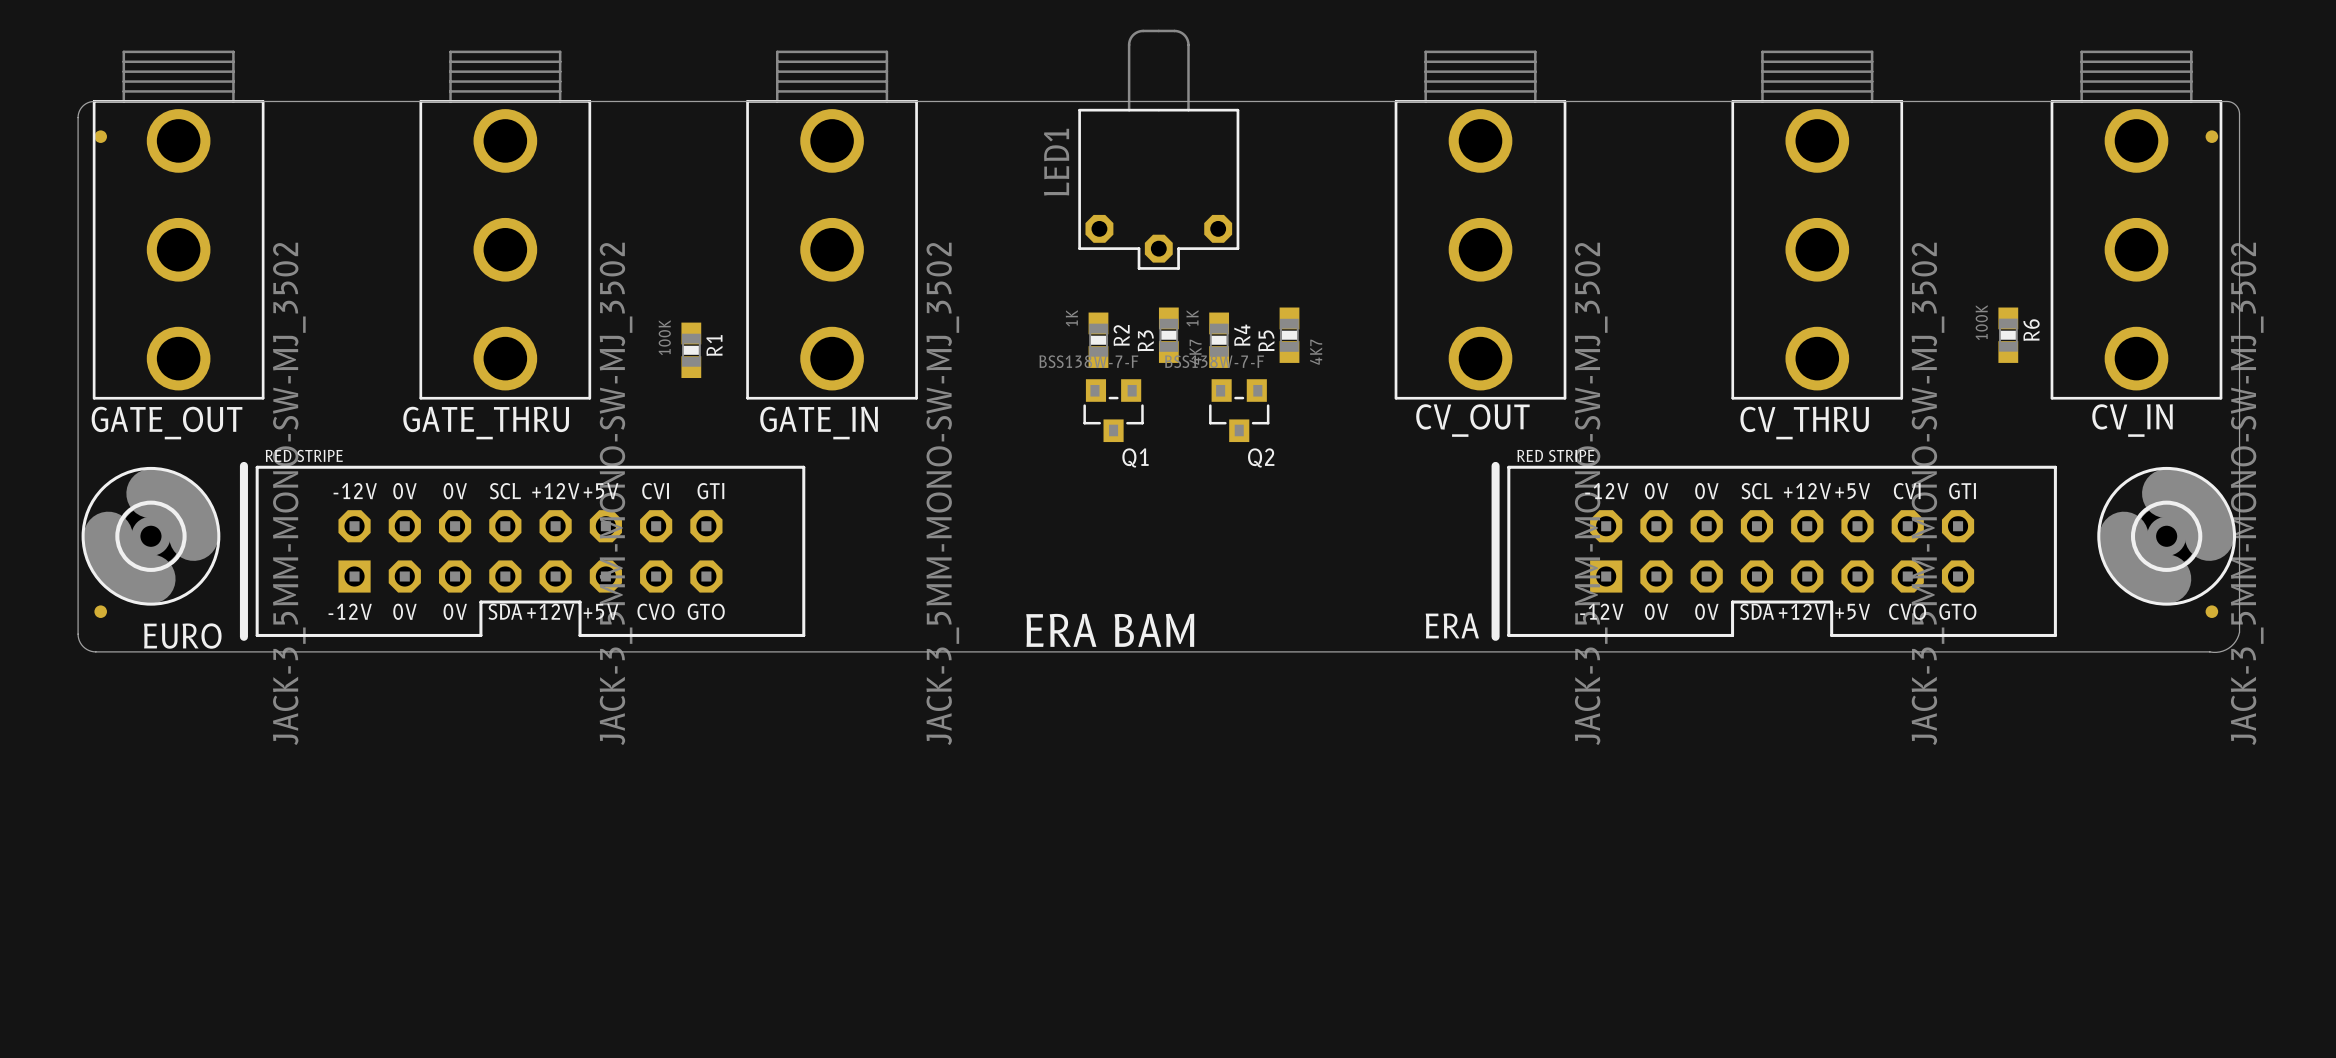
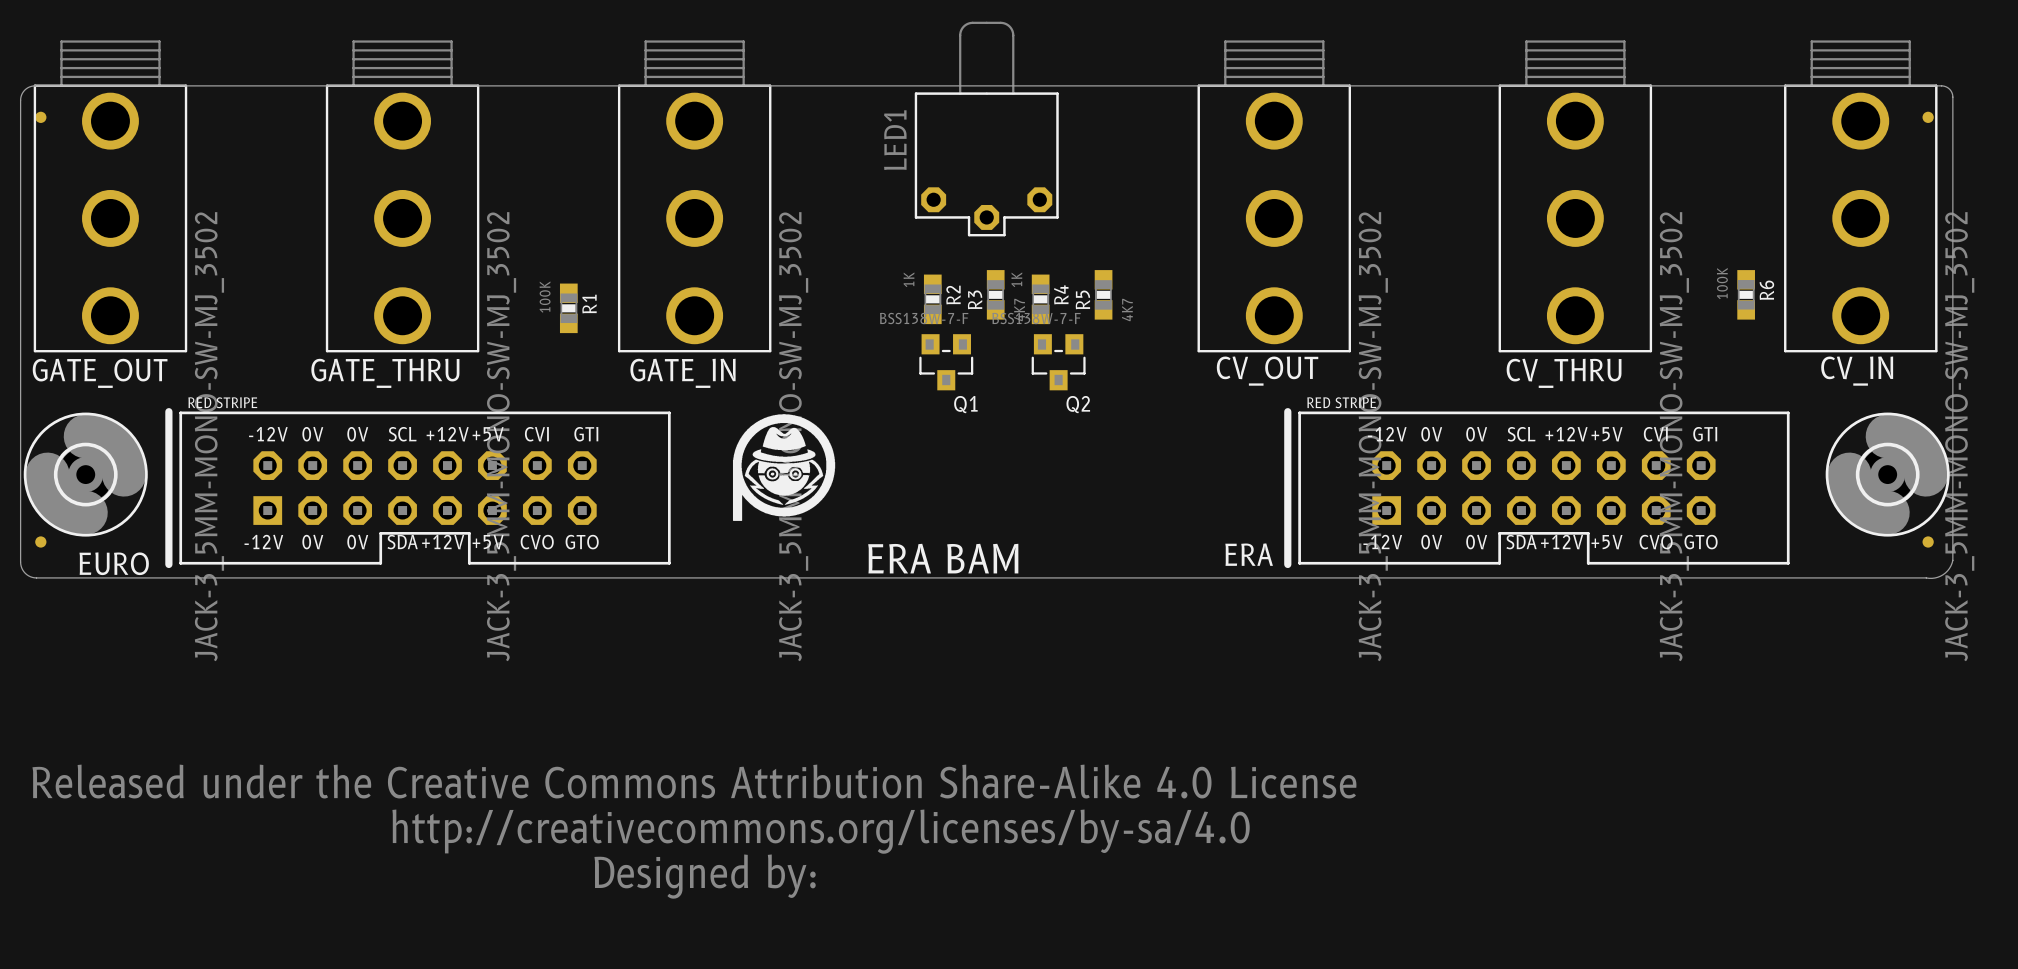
drawing: none -> [732, 414, 836, 521]
drawing: none -> [32, 764, 1357, 899]

